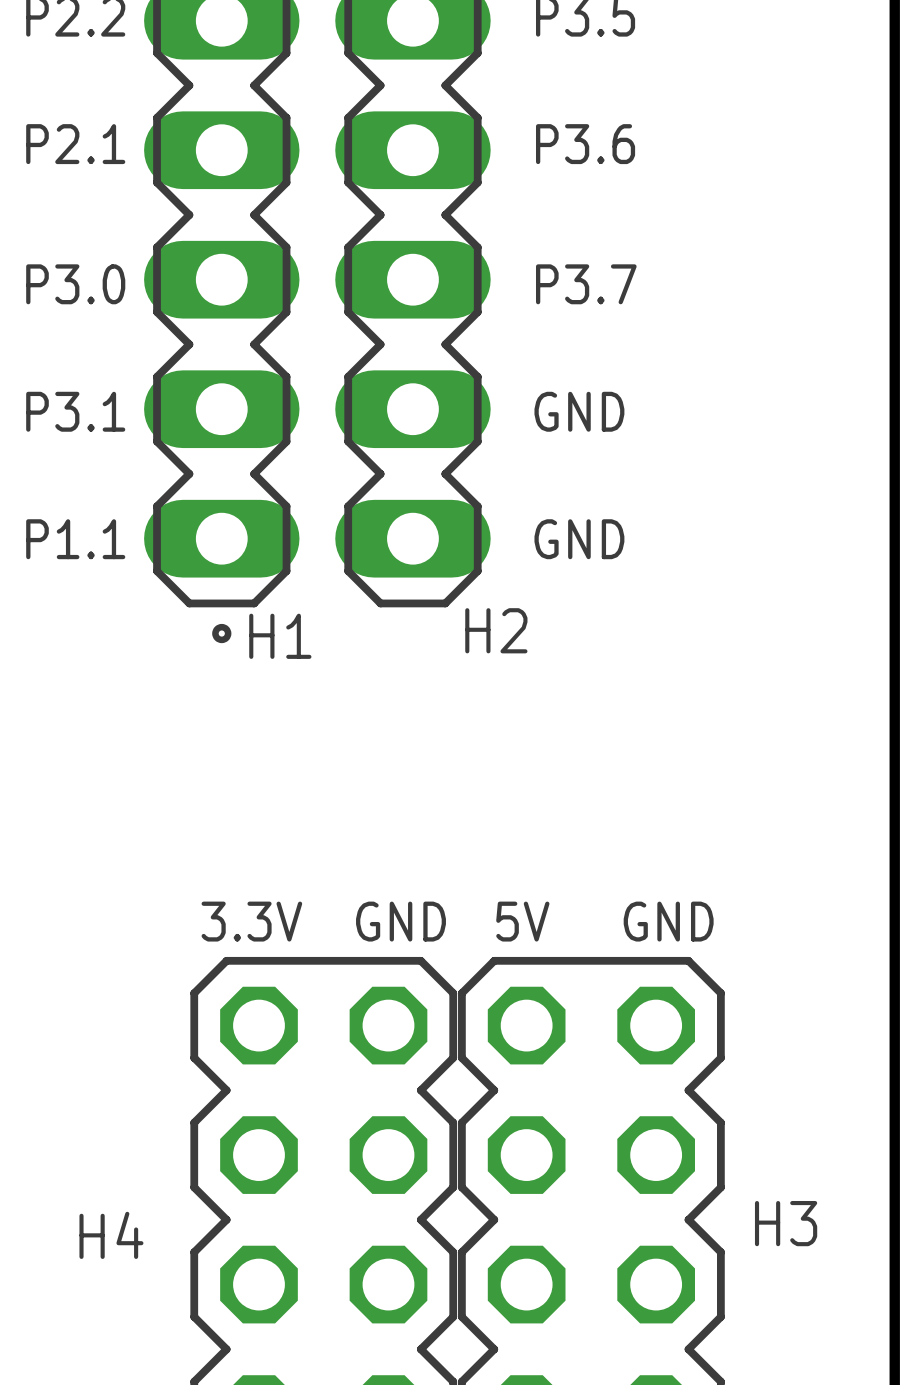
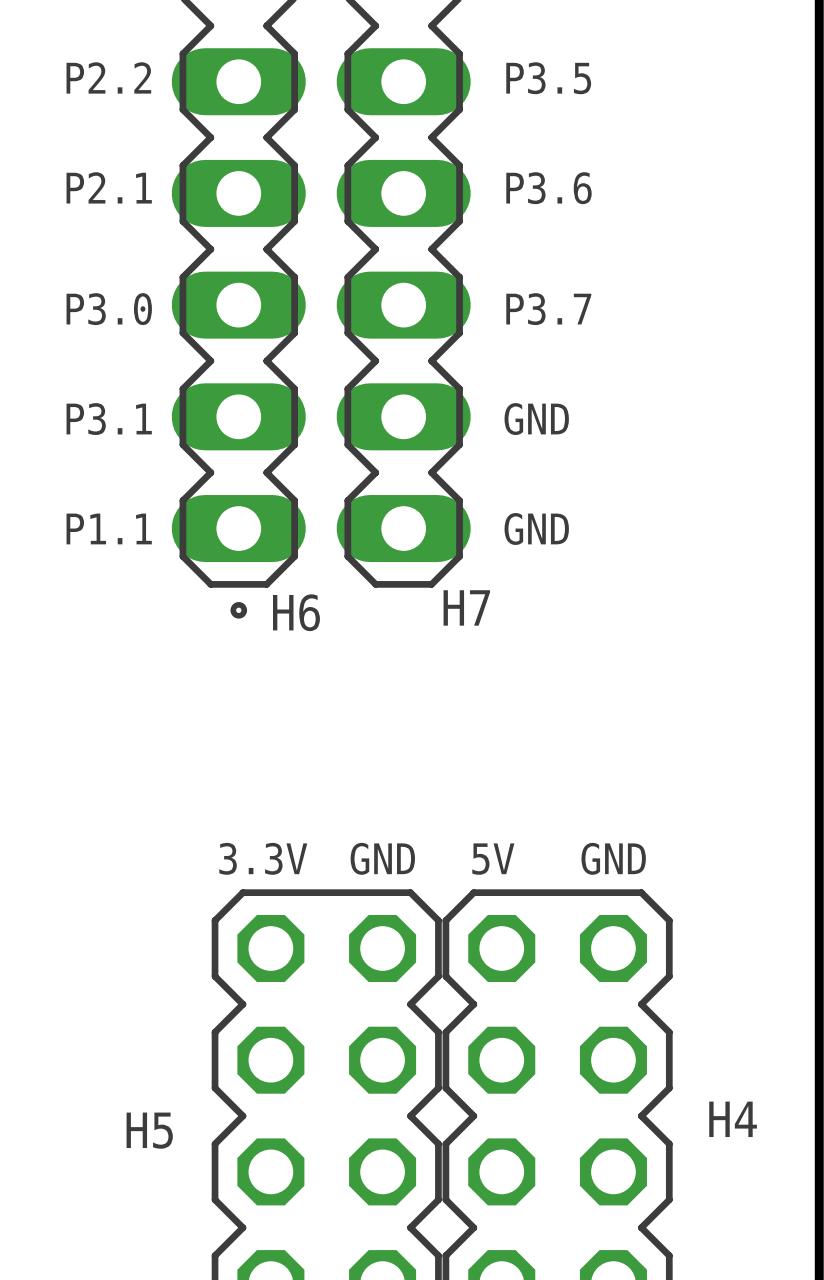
H2 name: H2 (496, 630) -> H7 (466, 607)
H1 name: H1 (280, 636) -> H6 (296, 612)
H3 name: H3 (786, 1223) -> H4 (733, 1119)
H4 name: H4 (111, 1235) -> H5 (149, 1130)

